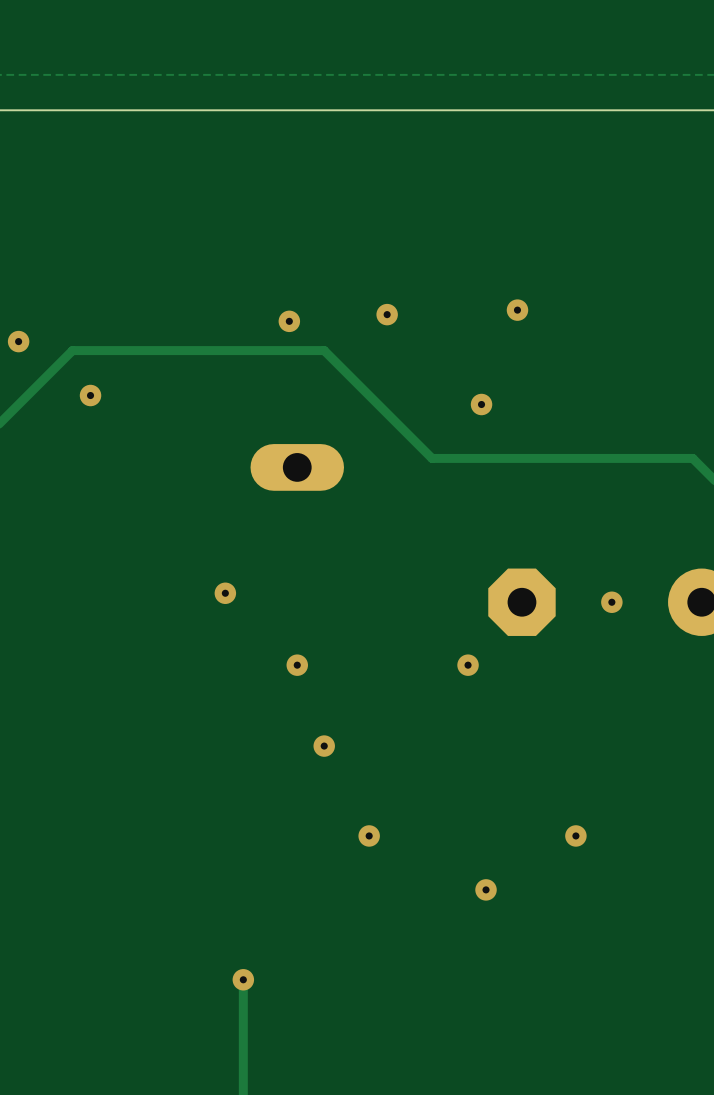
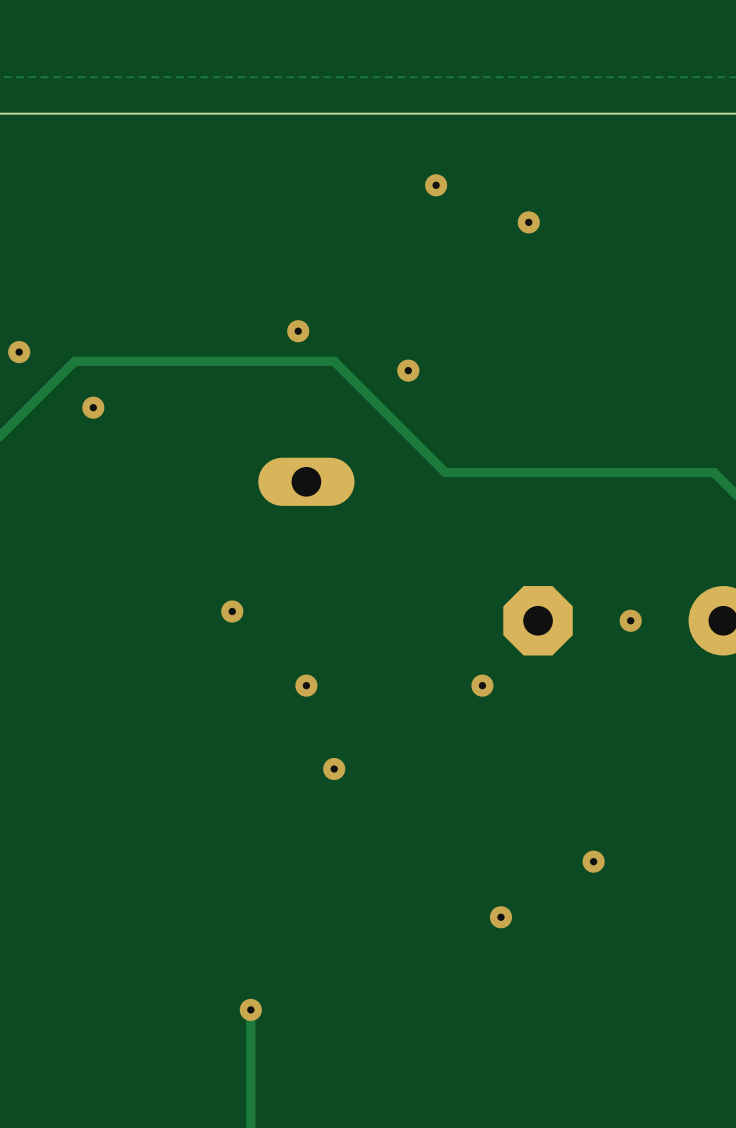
via: none -> (436, 185)
via: none -> (528, 222)
via: (517, 310) -> none
via position: (387, 314) -> (408, 370)
via: (481, 404) -> none
via: (369, 835) -> none

